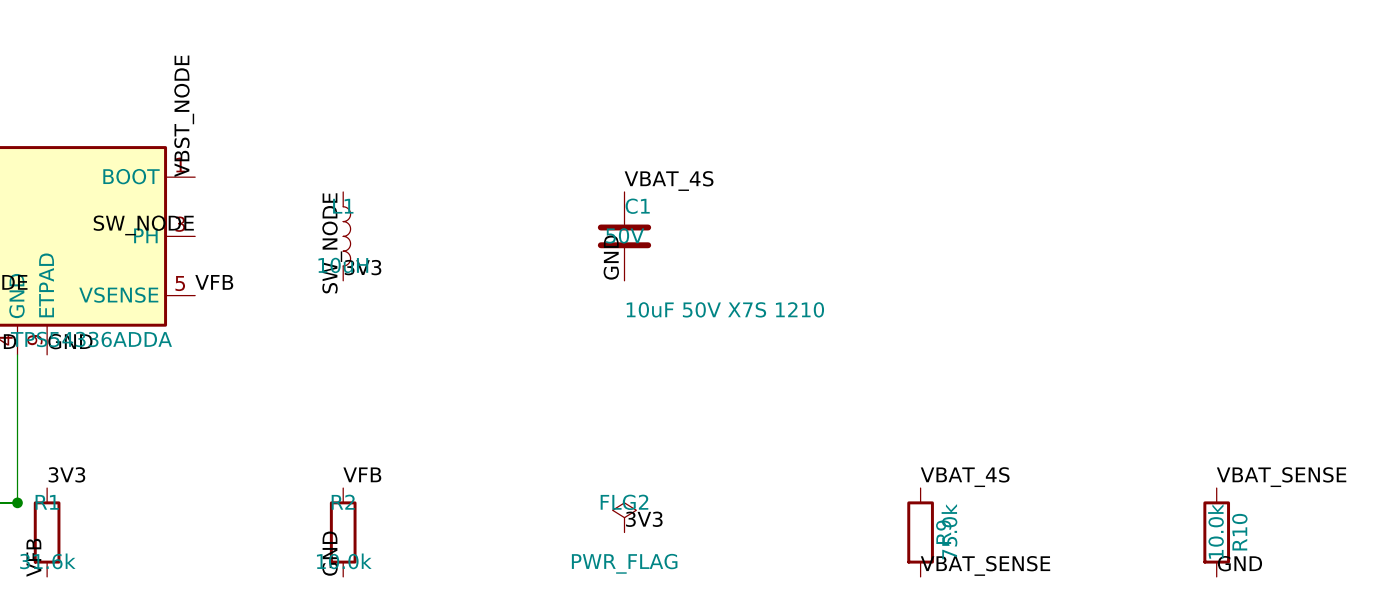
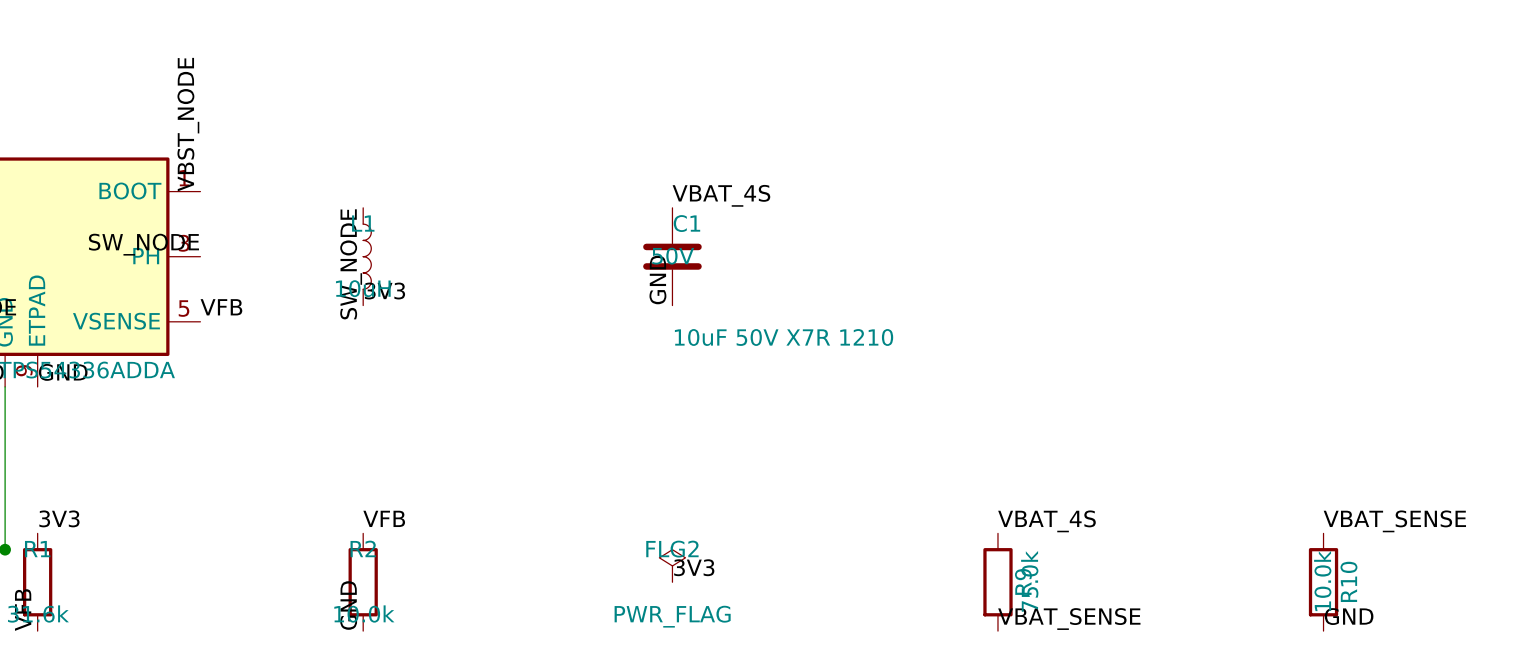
C1 value: 10uF 50V X7S 1210 (725, 309) -> 10uF 50V X7R 1210 (784, 337)

